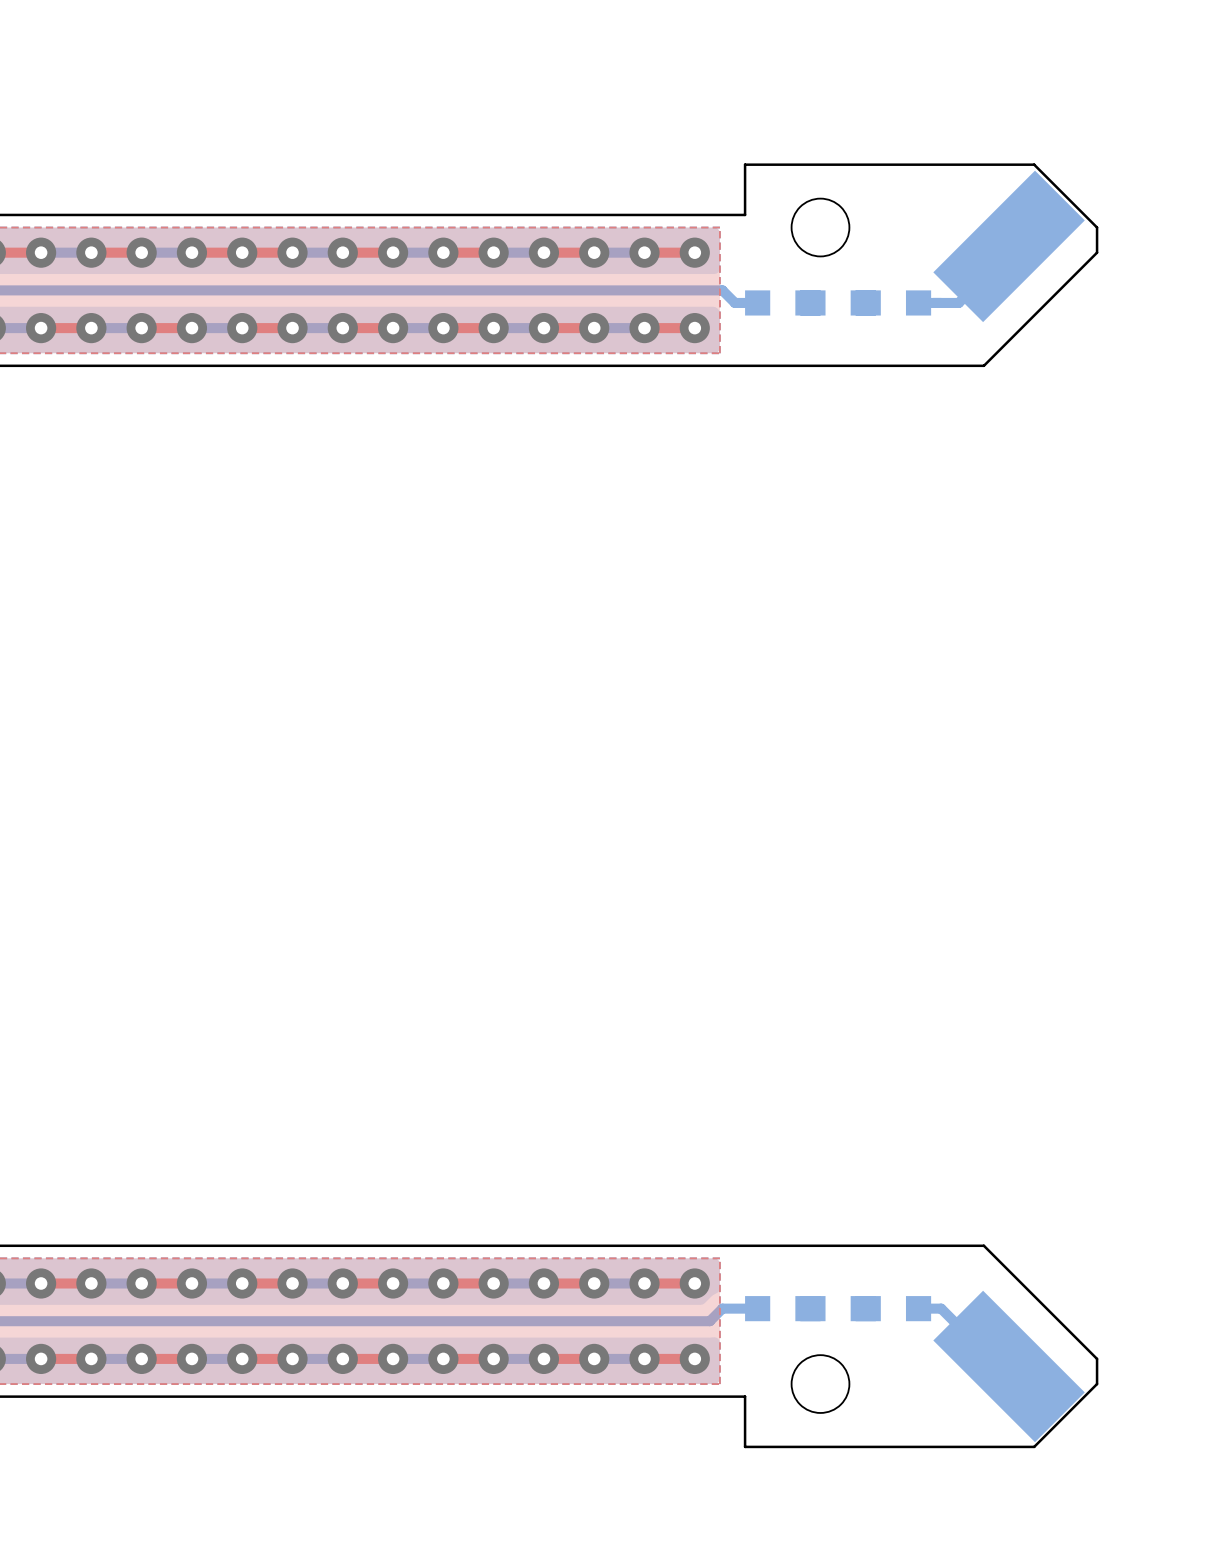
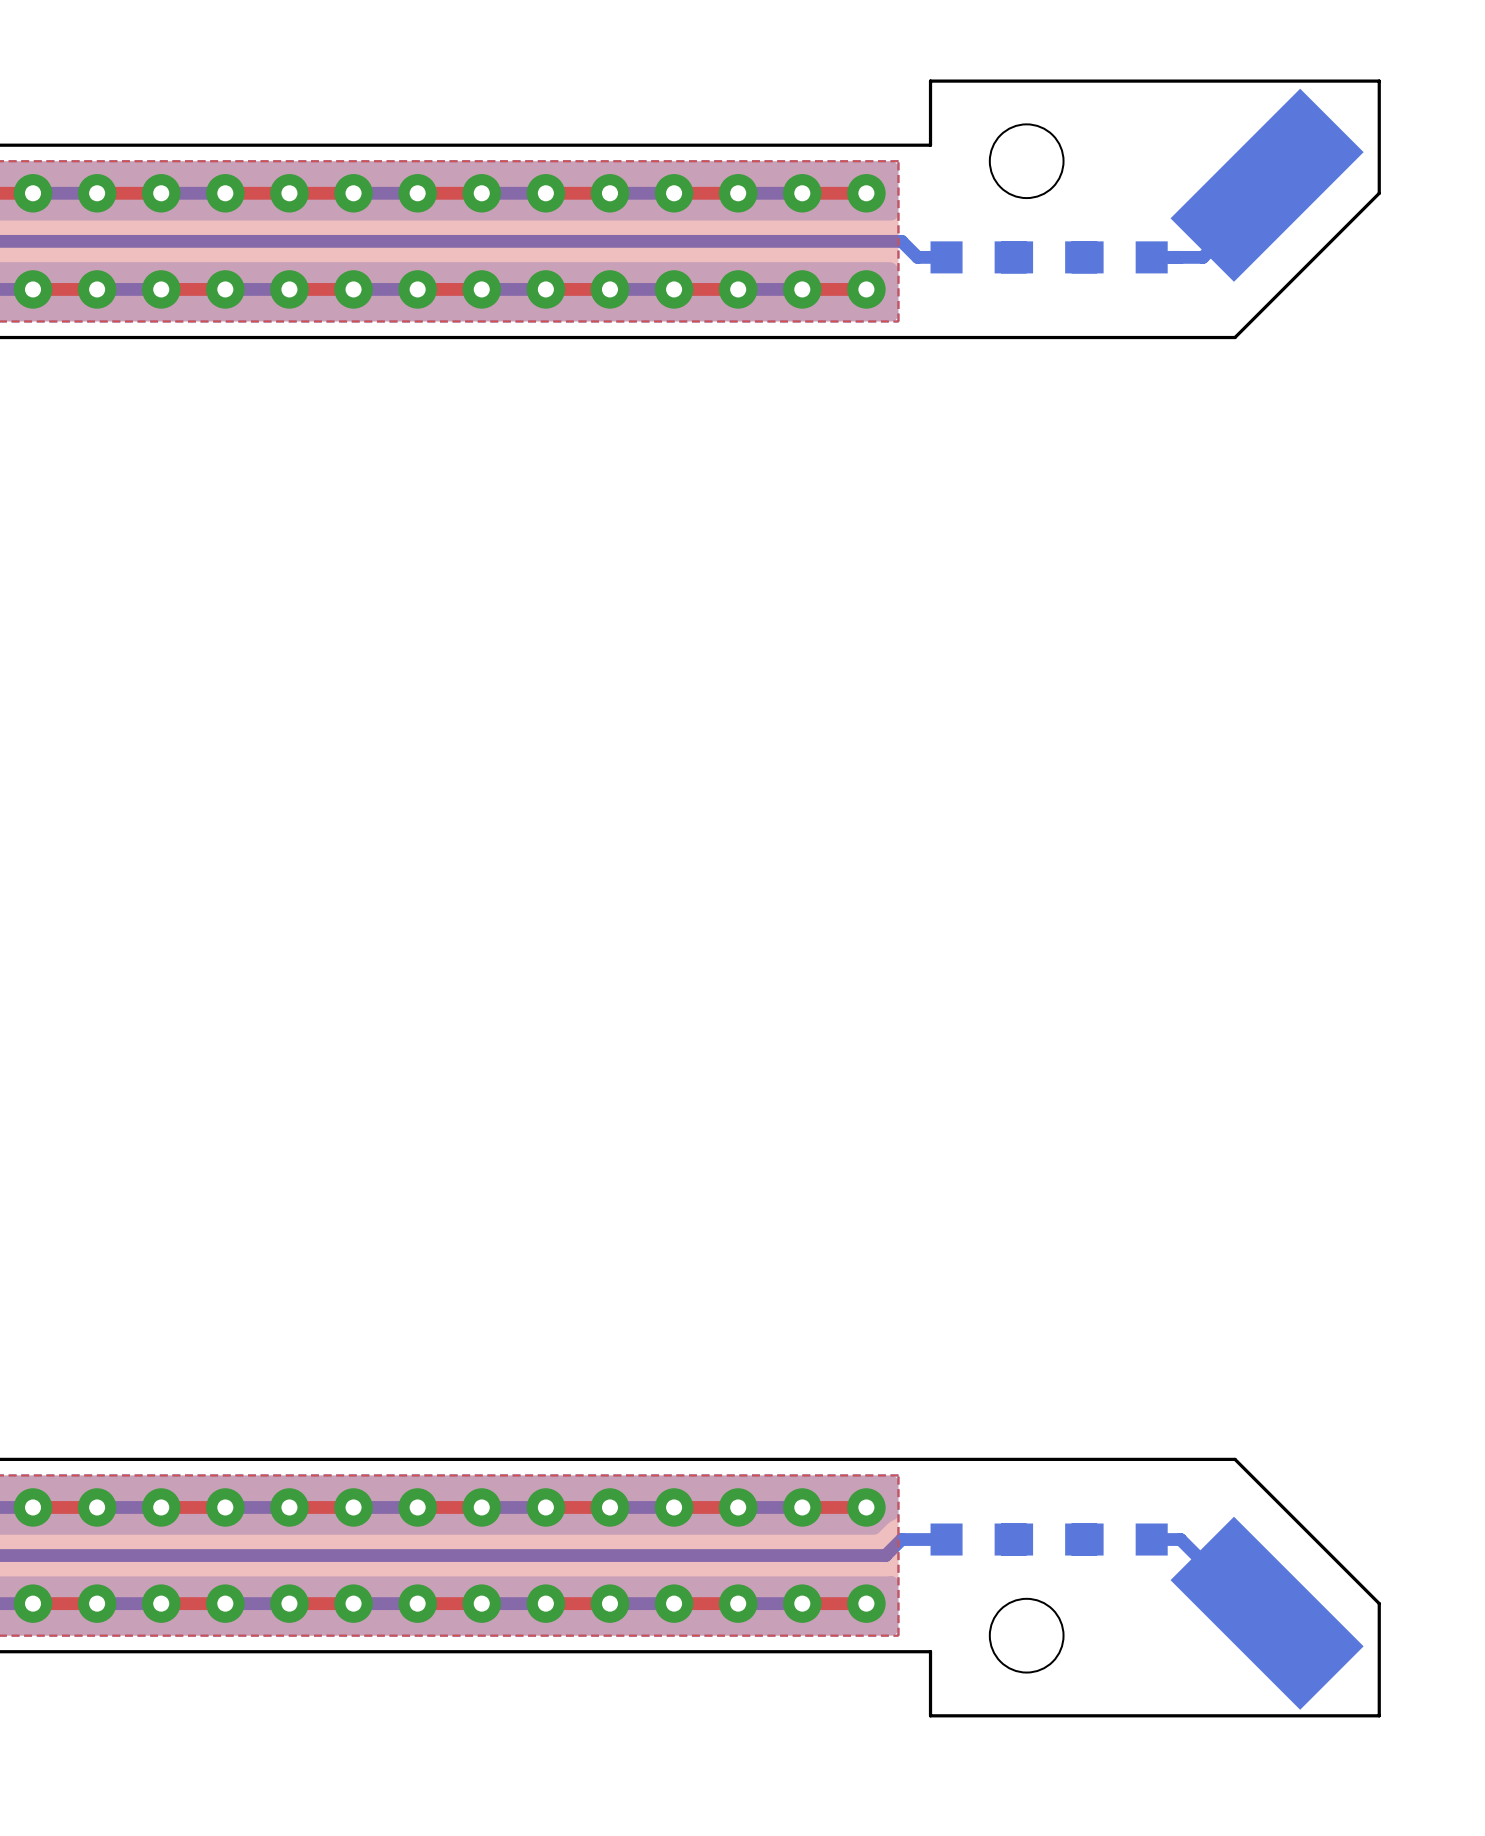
board edge: (1034, 164) (1097, 227) -> (1299, 81) (1379, 81) (1379, 161)
board edge: (1097, 1384) (1034, 1446) -> (1379, 1635) (1379, 1715) (1299, 1715)

